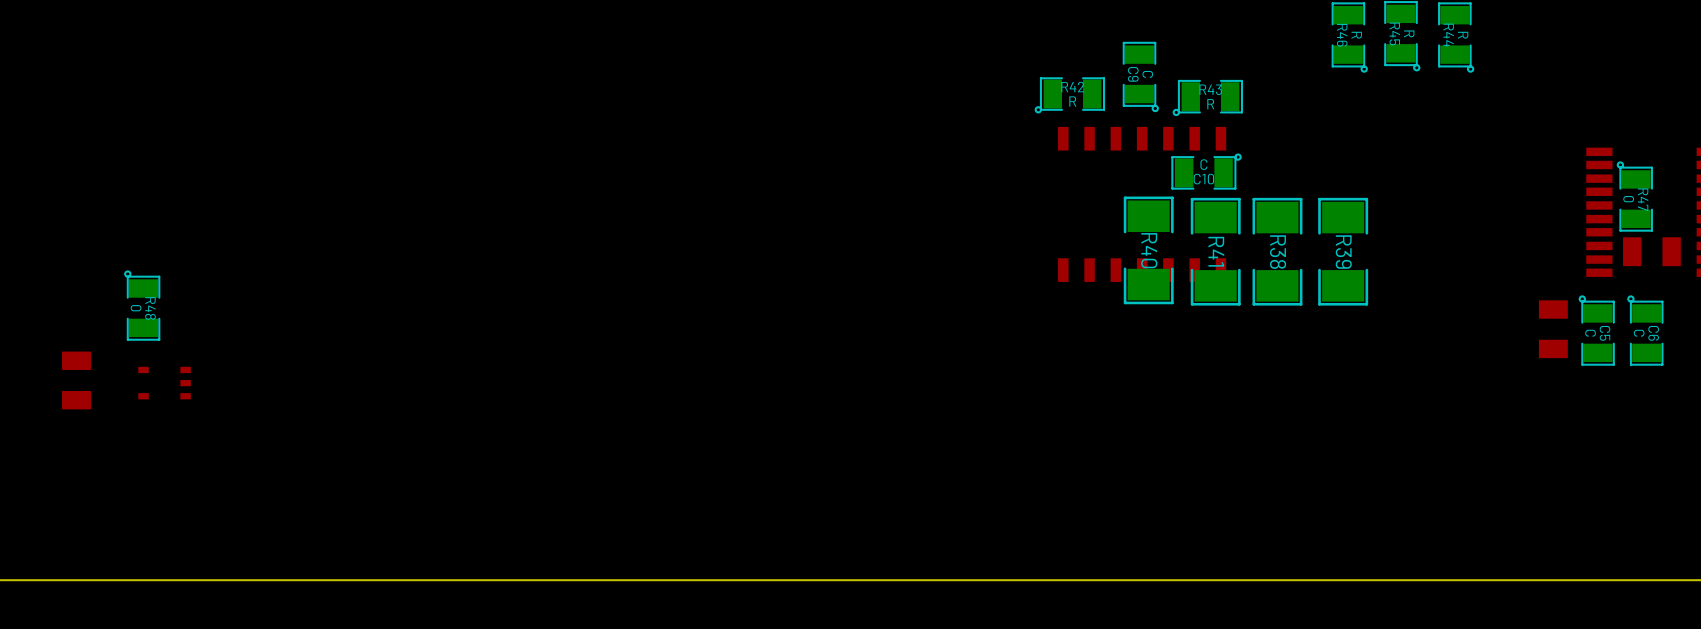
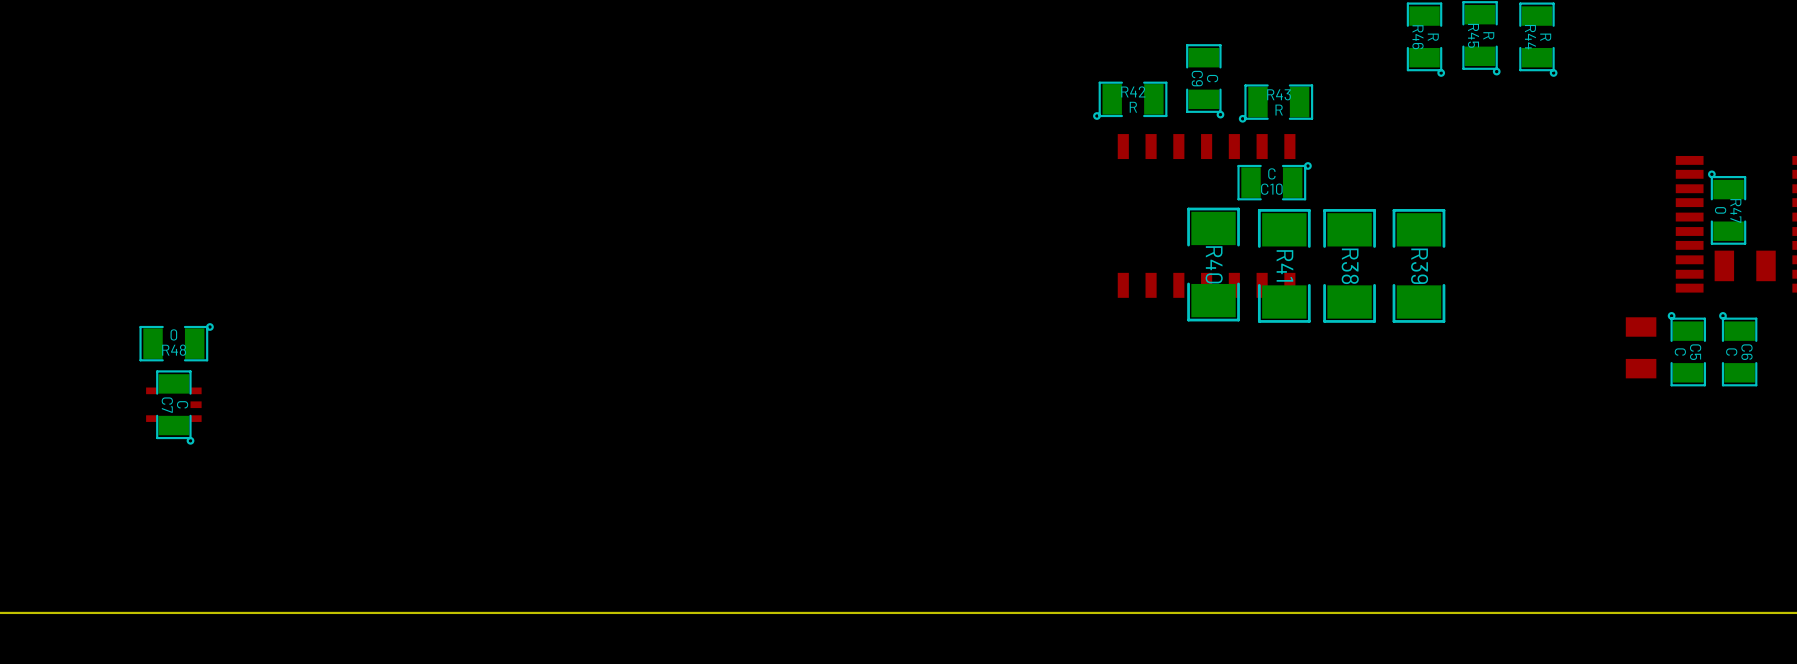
R48 rotation: 0° (142, 305) -> 90° clockwise (176, 342)
C7 side: top (76, 380) -> bottom (175, 407)

